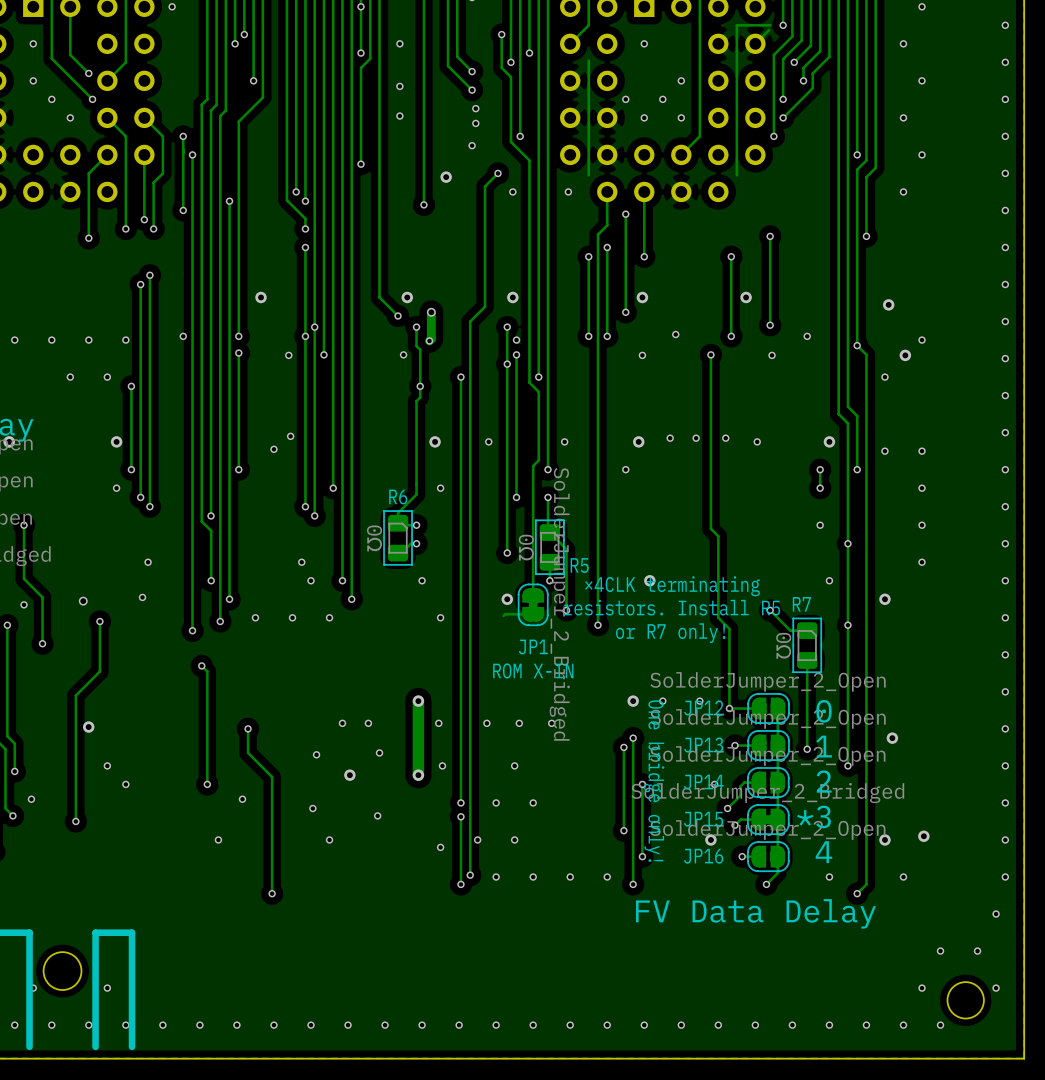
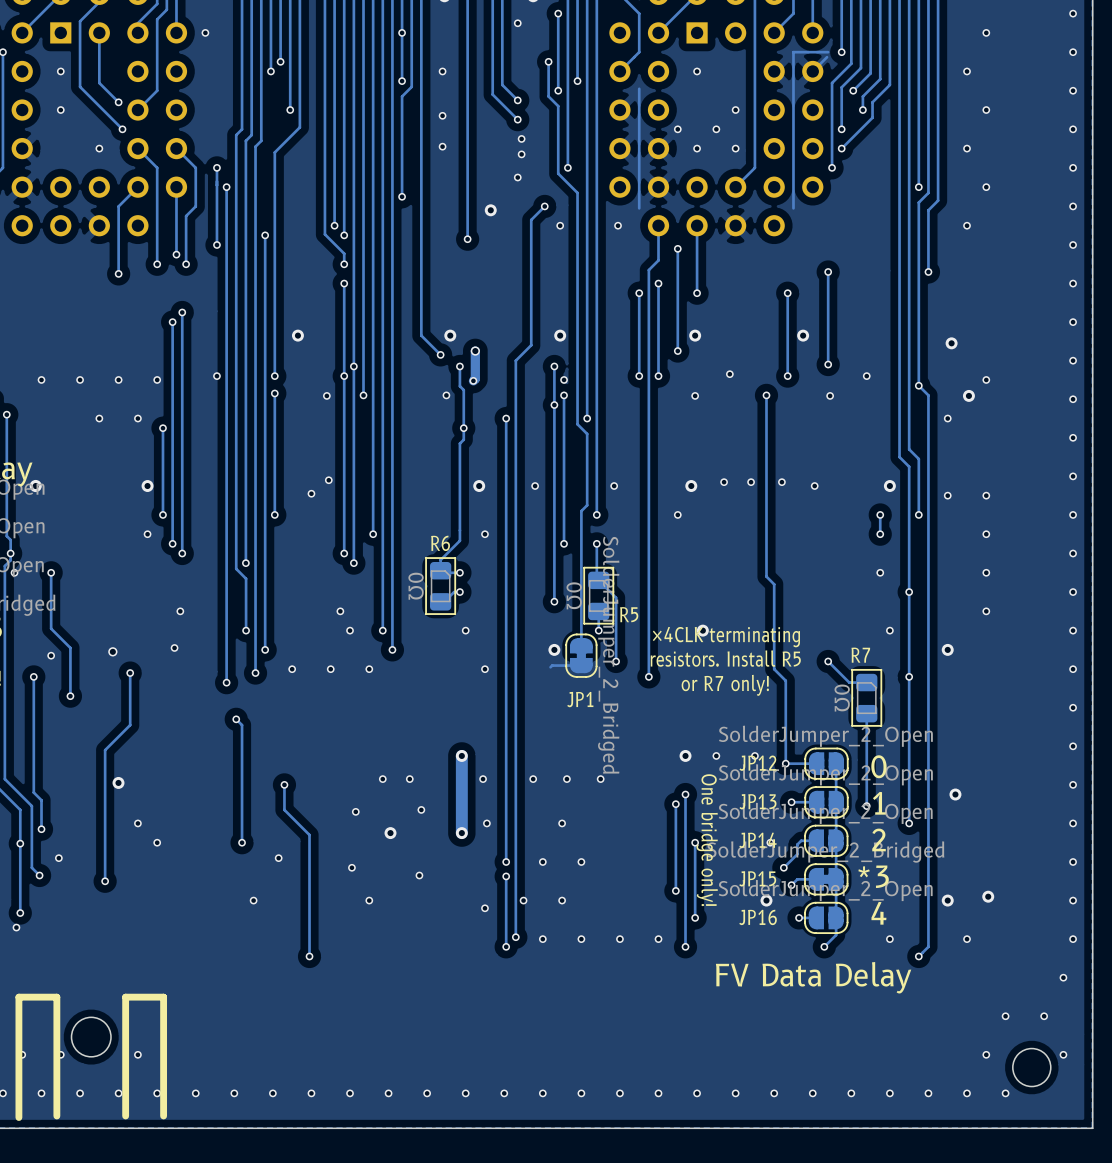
via: (51, 99) -> none
text: ROM X-IN (533, 670) -> none

